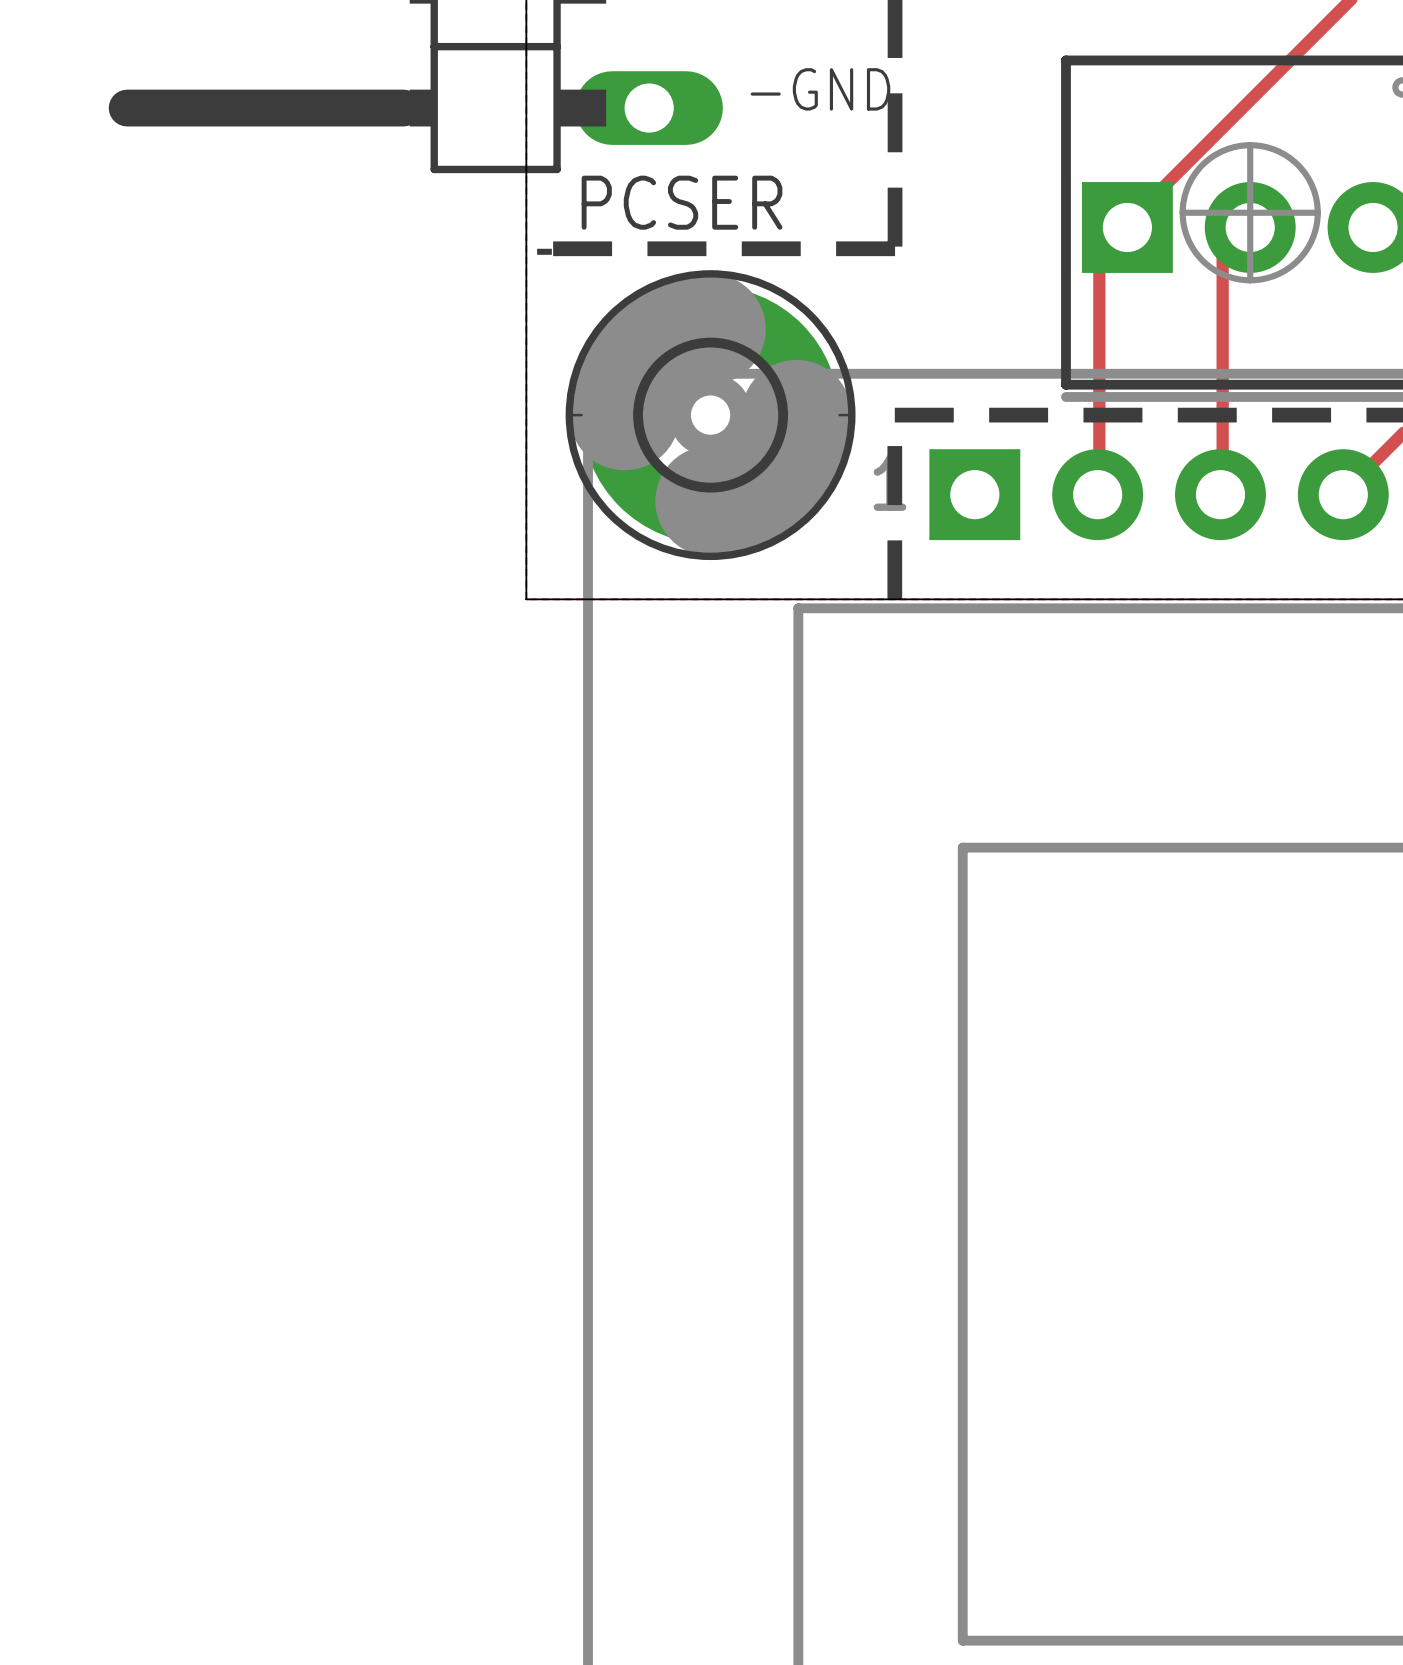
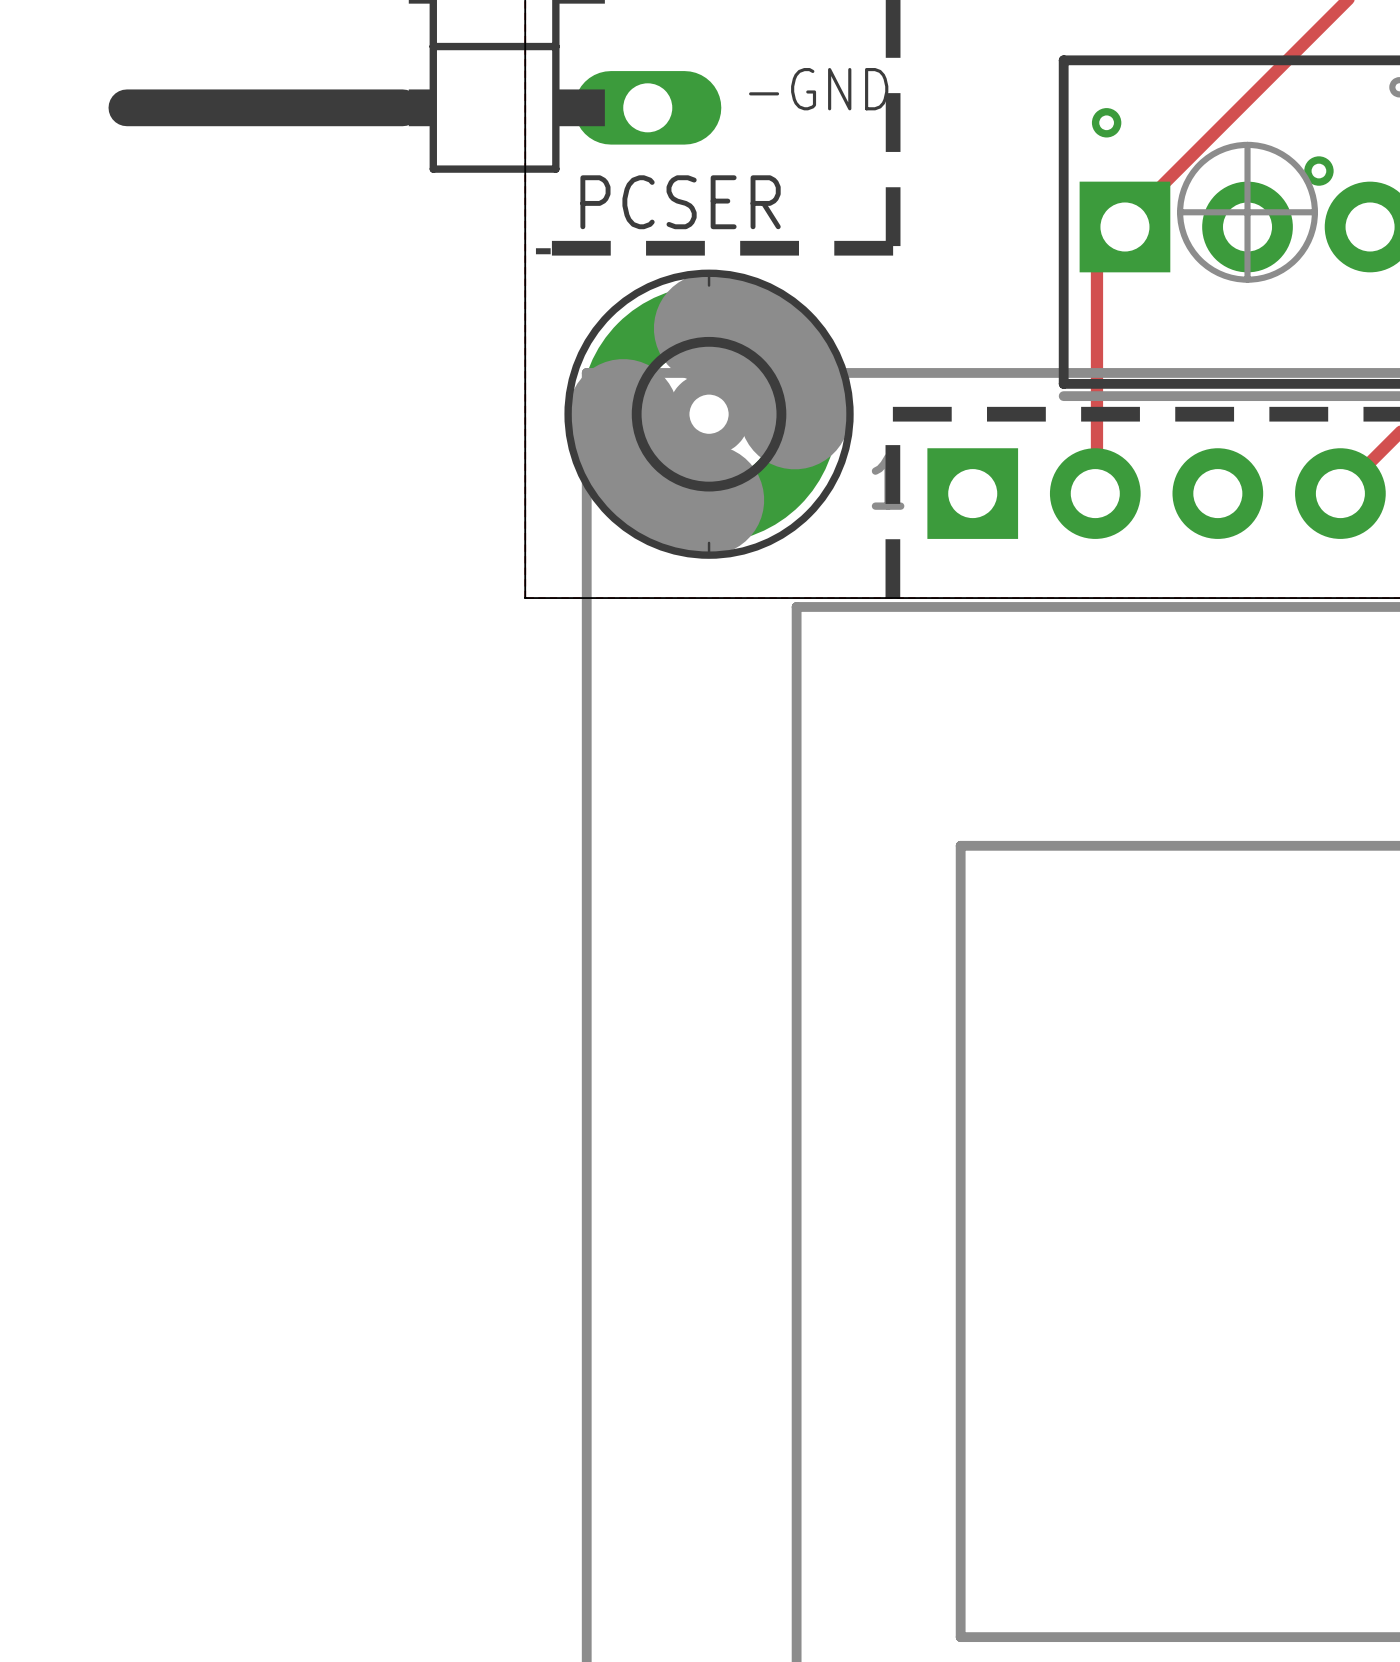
via: none -> (1106, 122)
via: none -> (1318, 171)
track: (1250, 227) (1222, 256) (1222, 492) (1220, 494) -> none
part rotation: 0° (710, 415) -> 90° clockwise (709, 414)

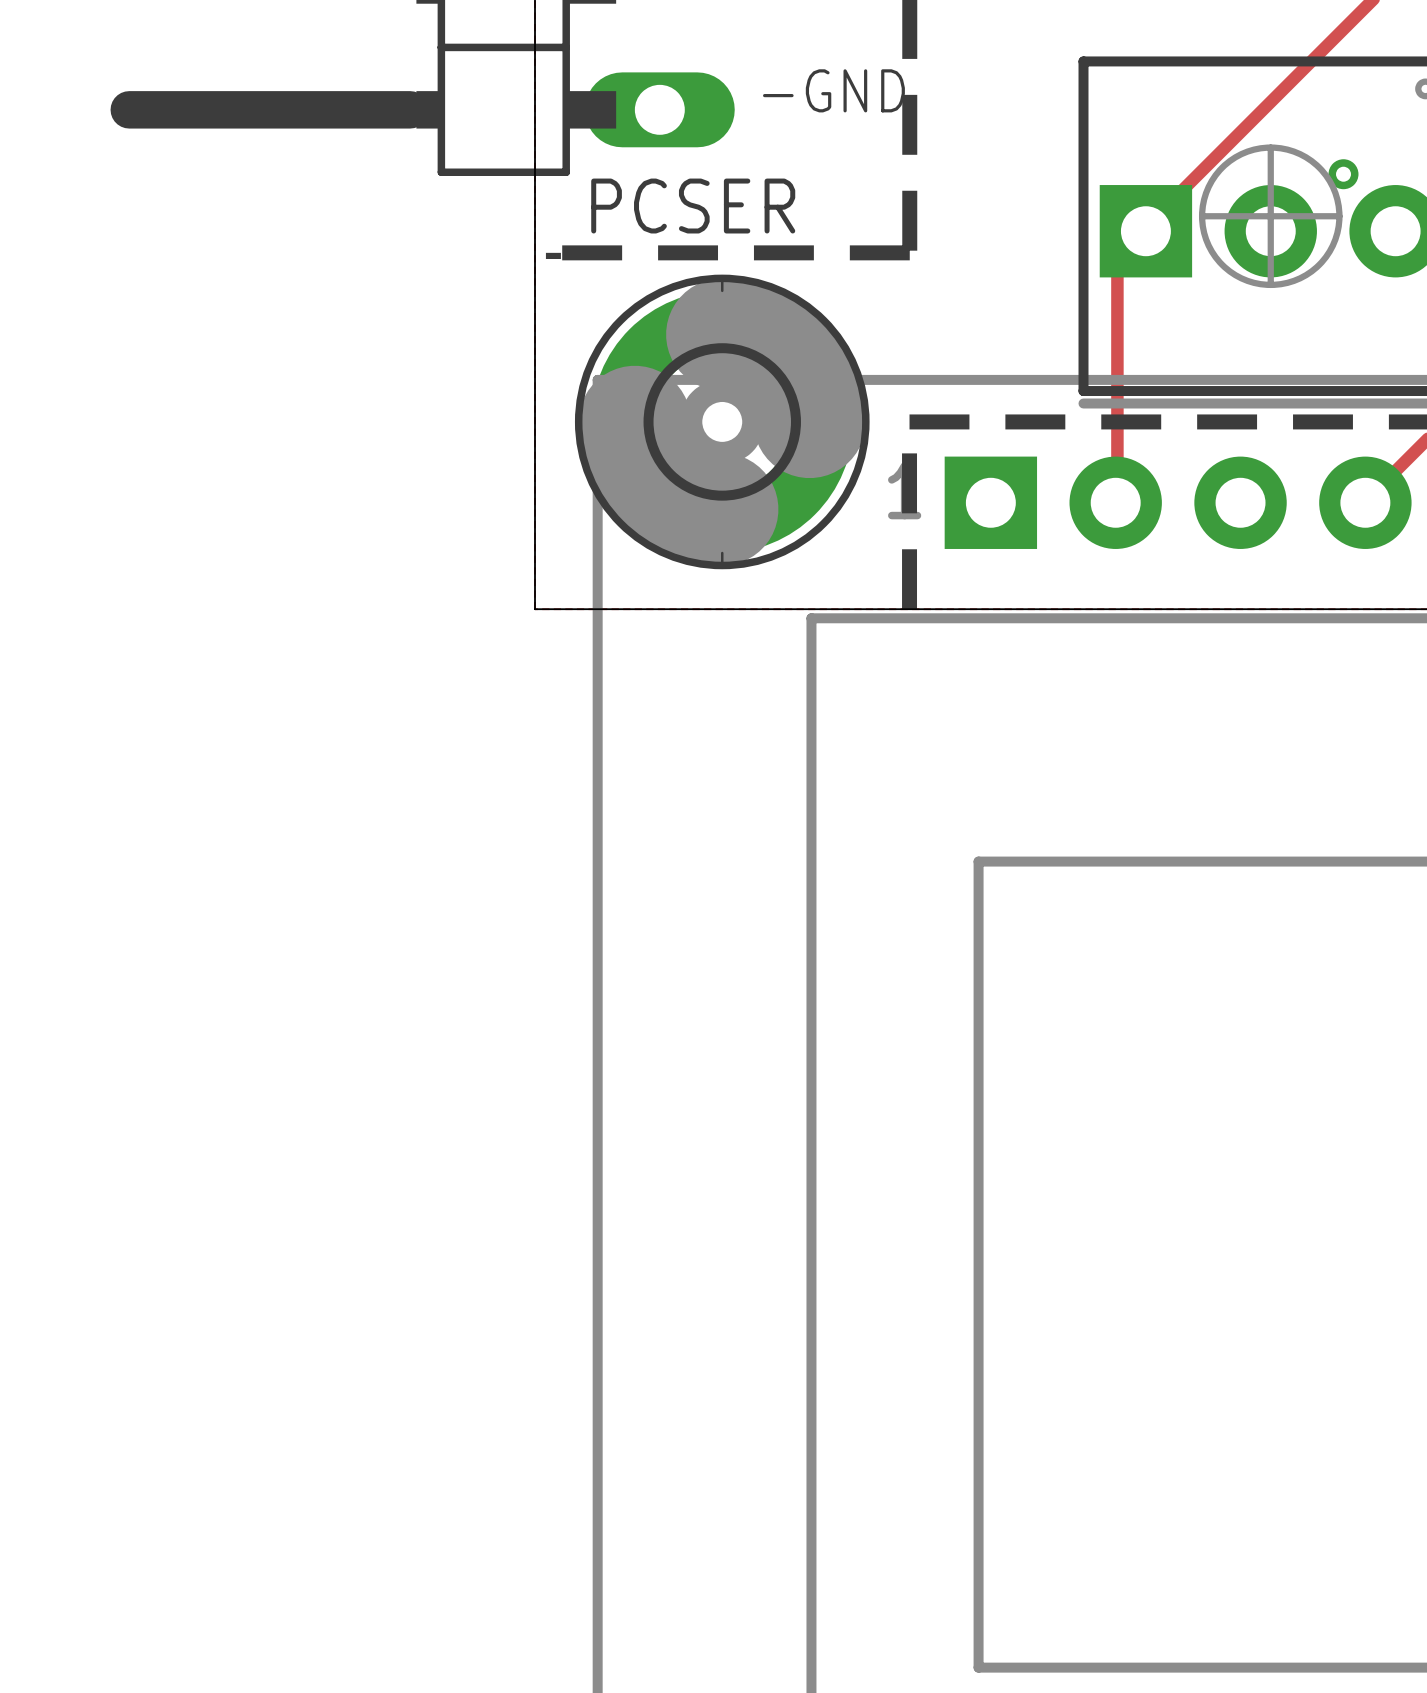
via: (1106, 122) -> none

